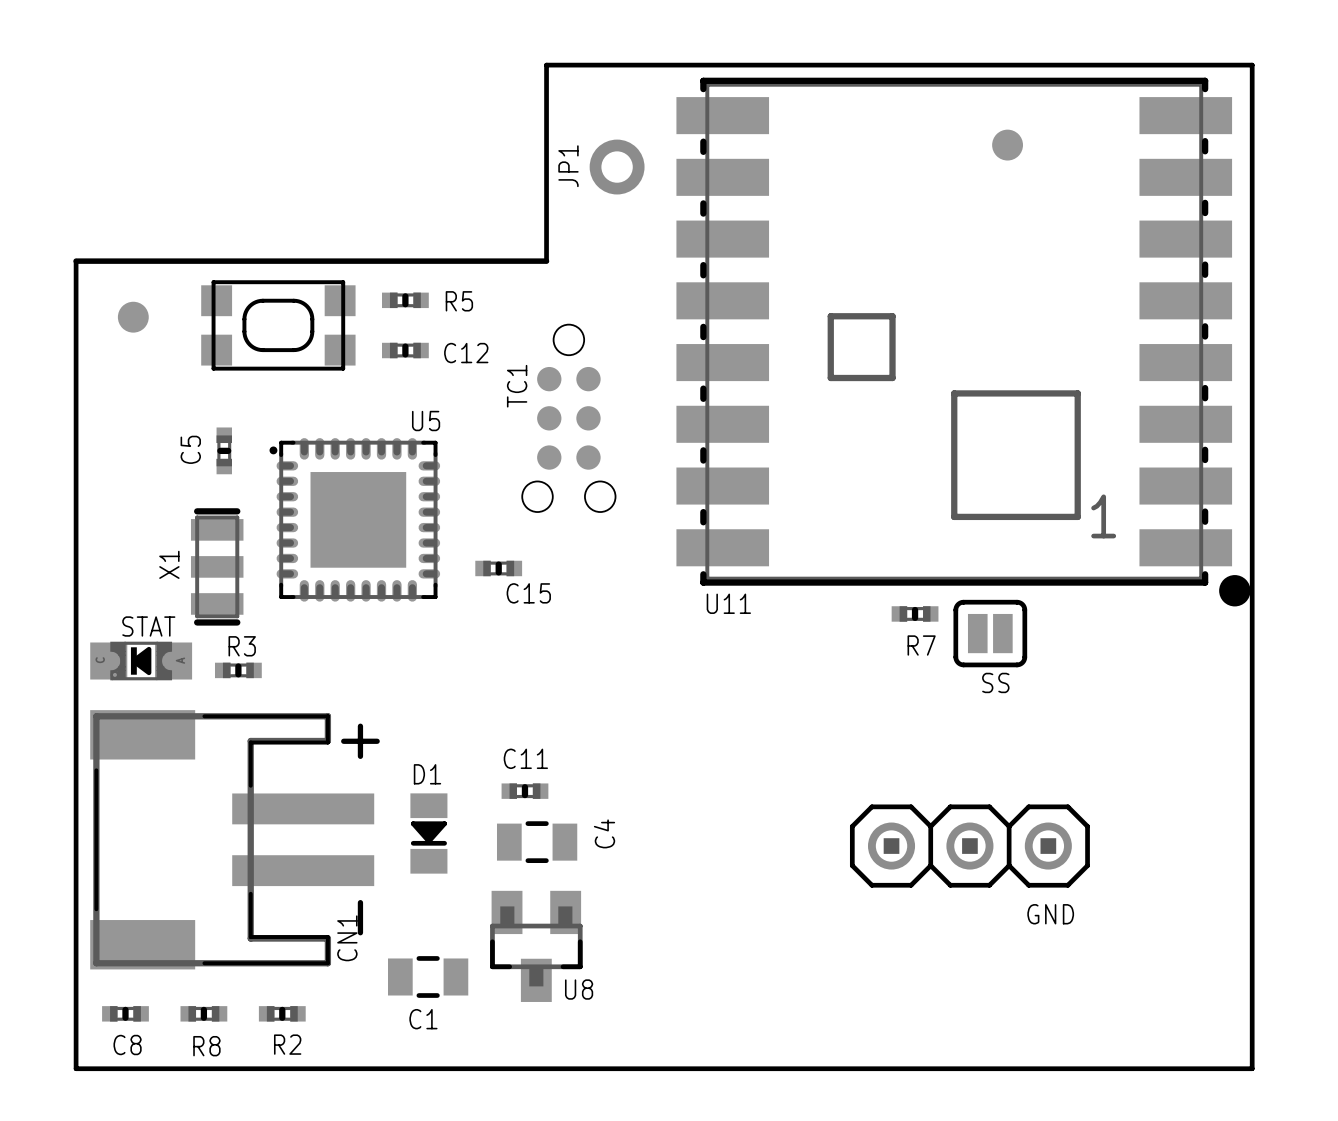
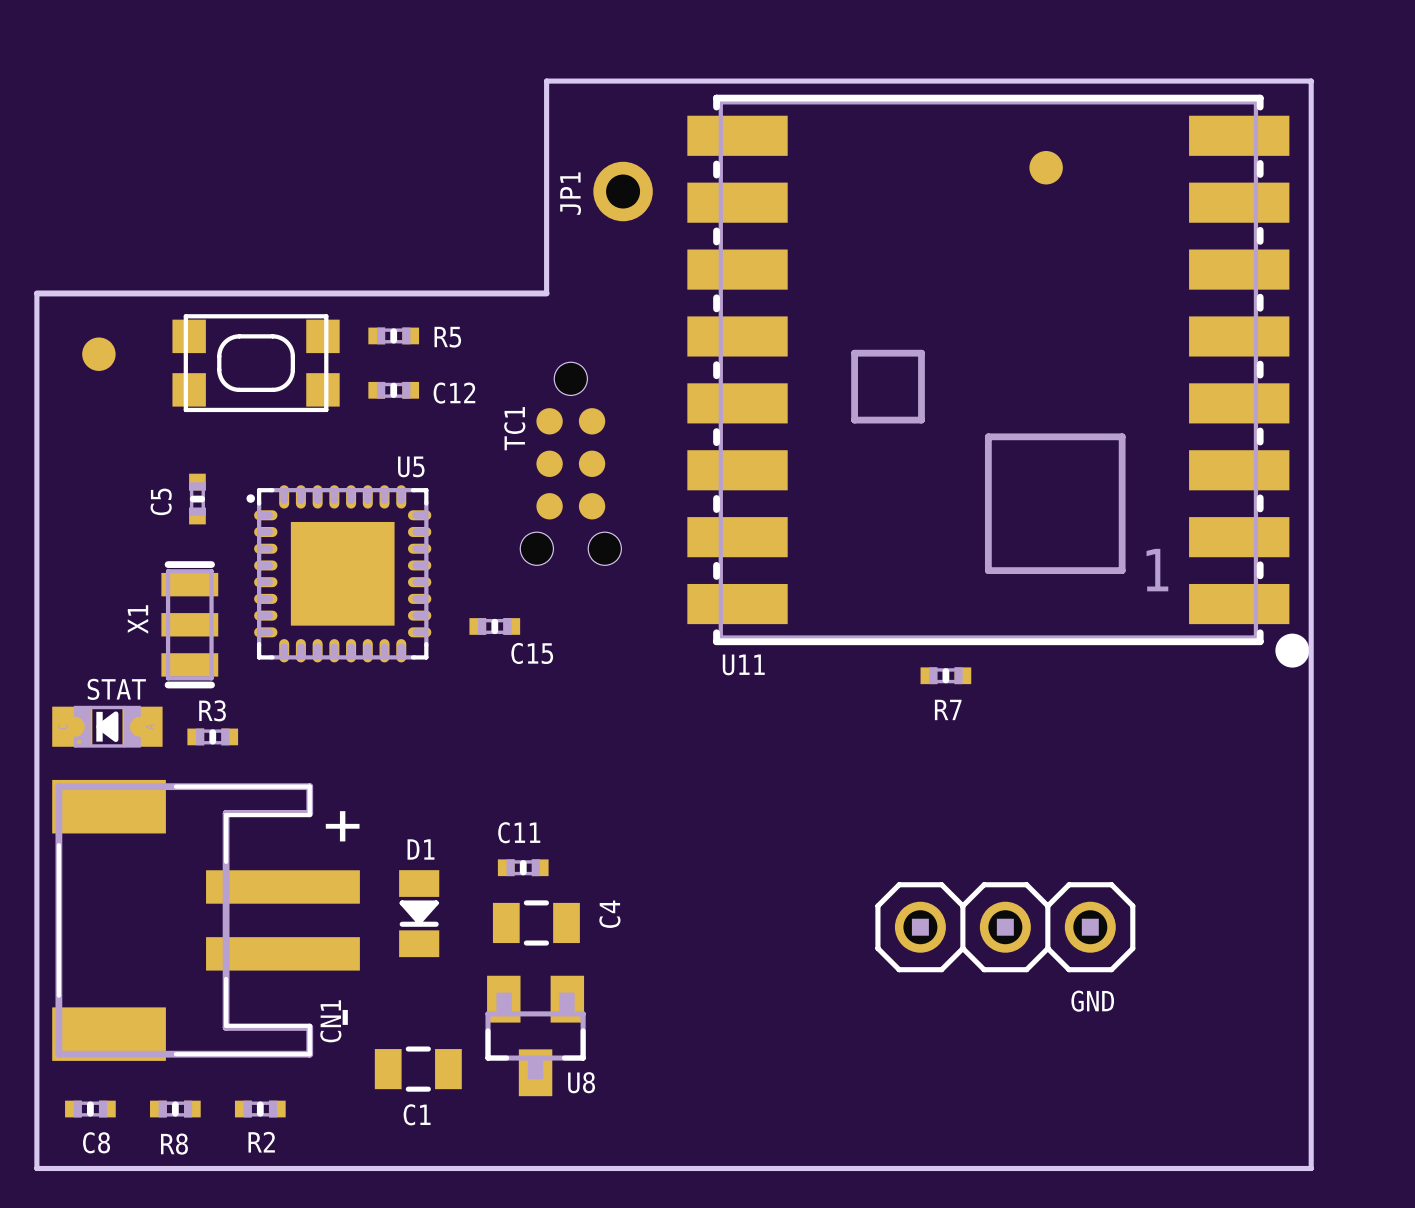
SS: (990, 633) -> none

